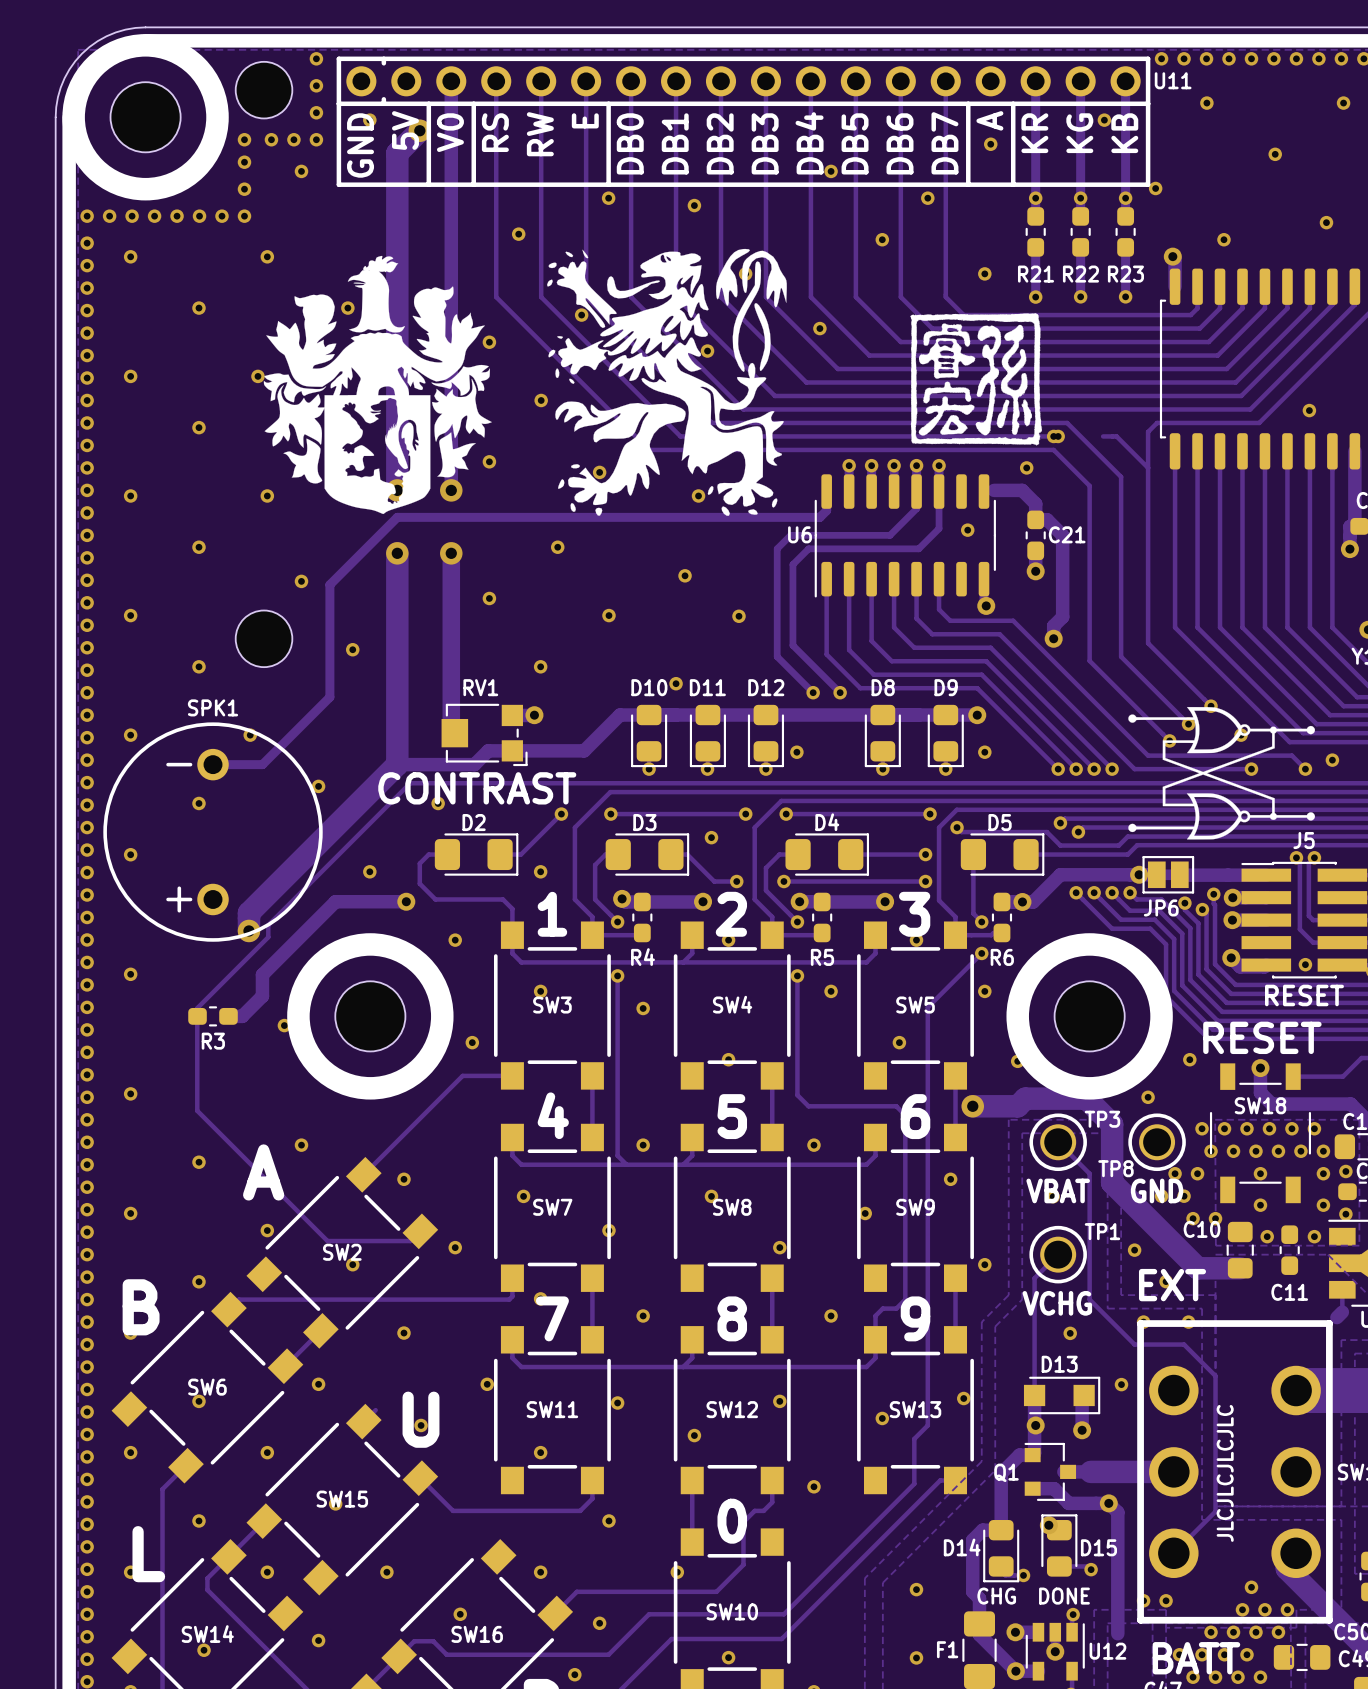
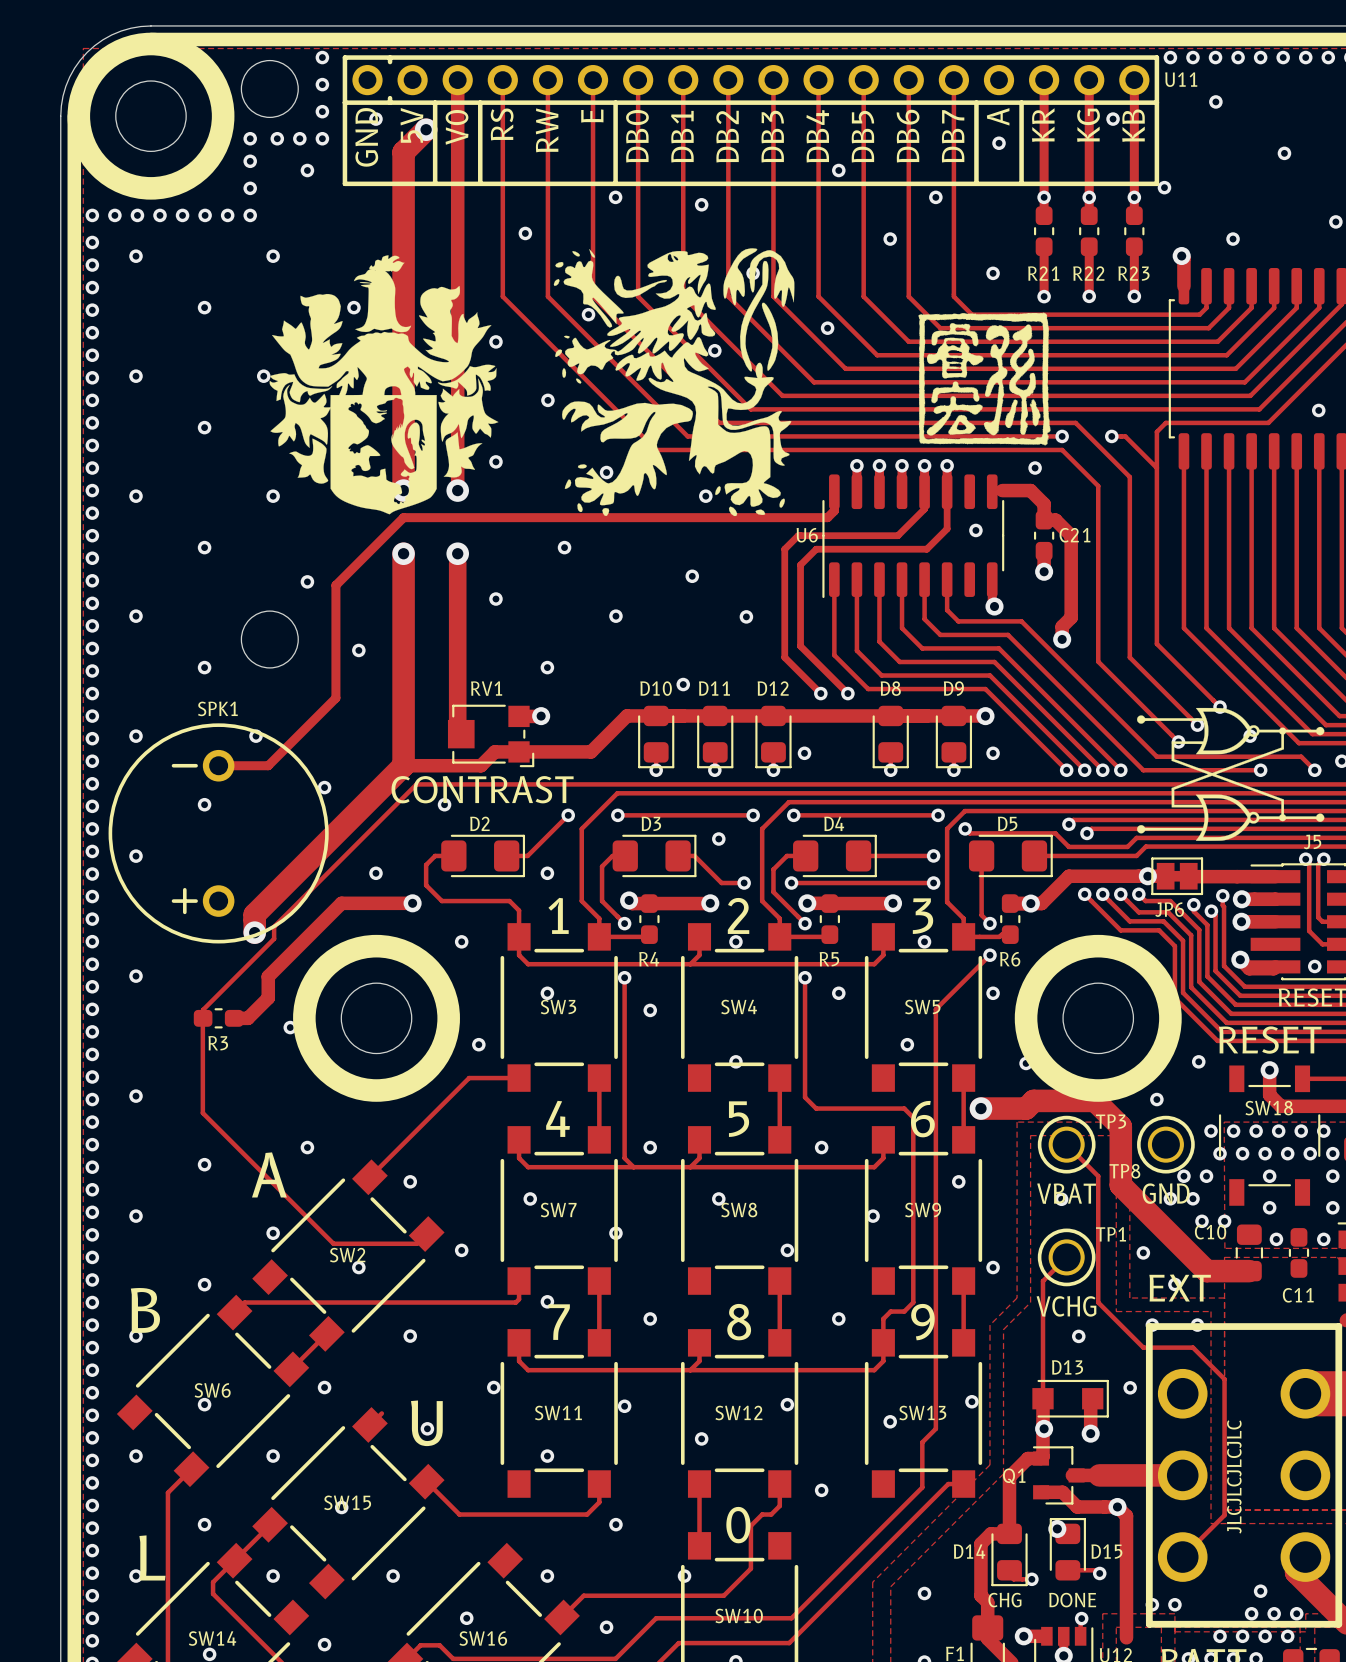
via position: (1058, 436) -> (1111, 436)

